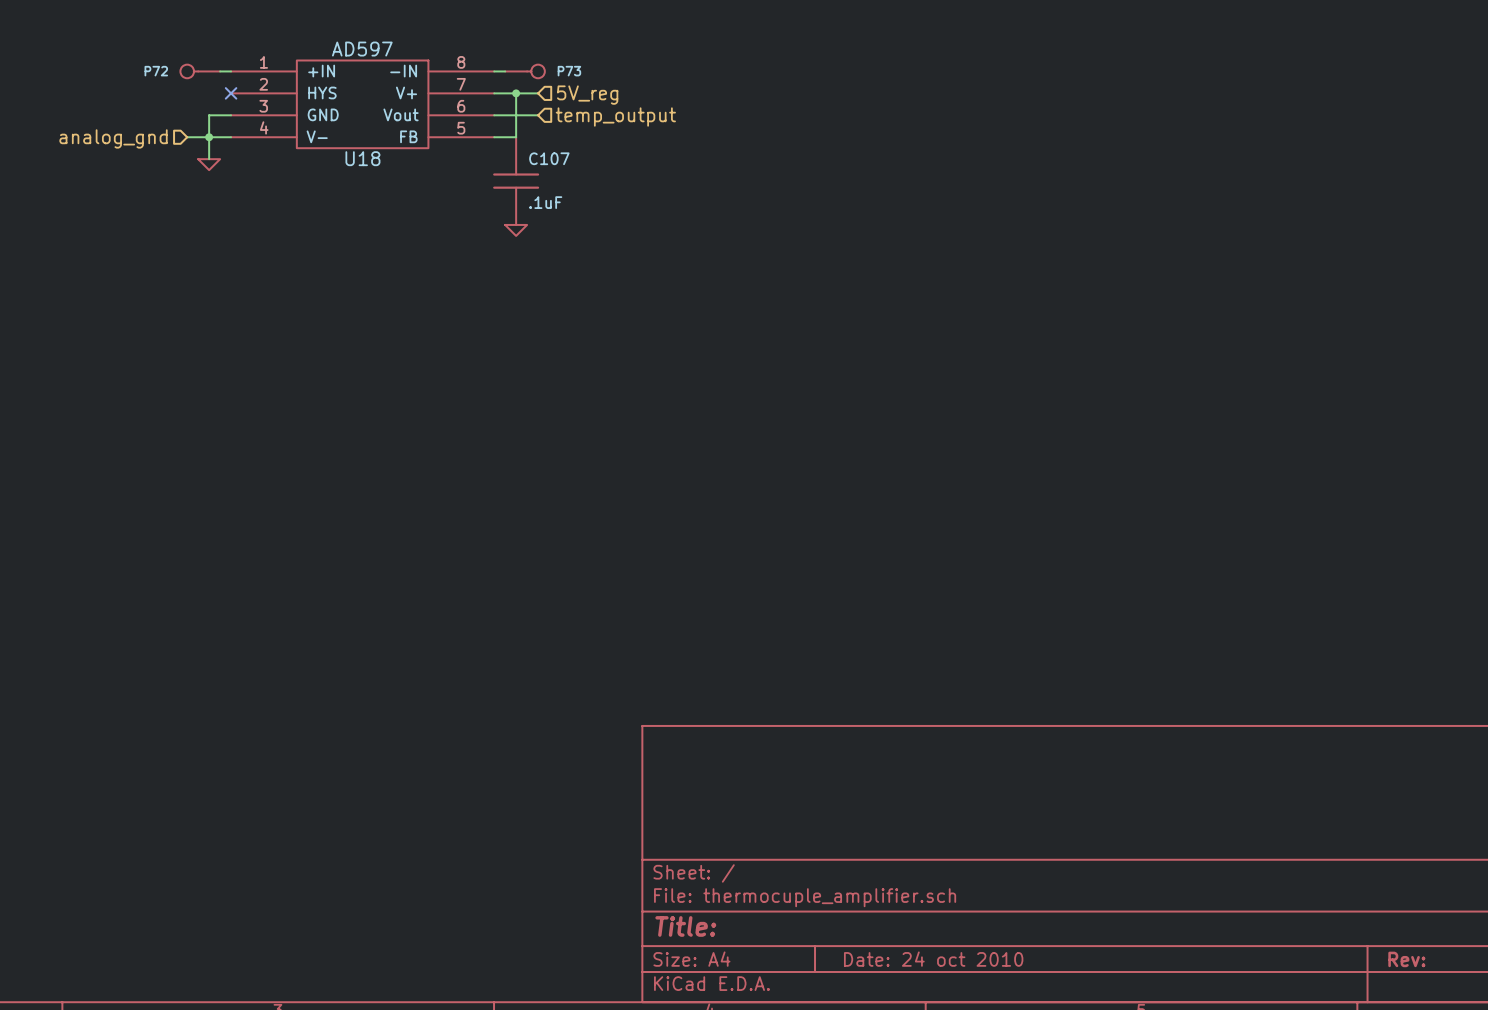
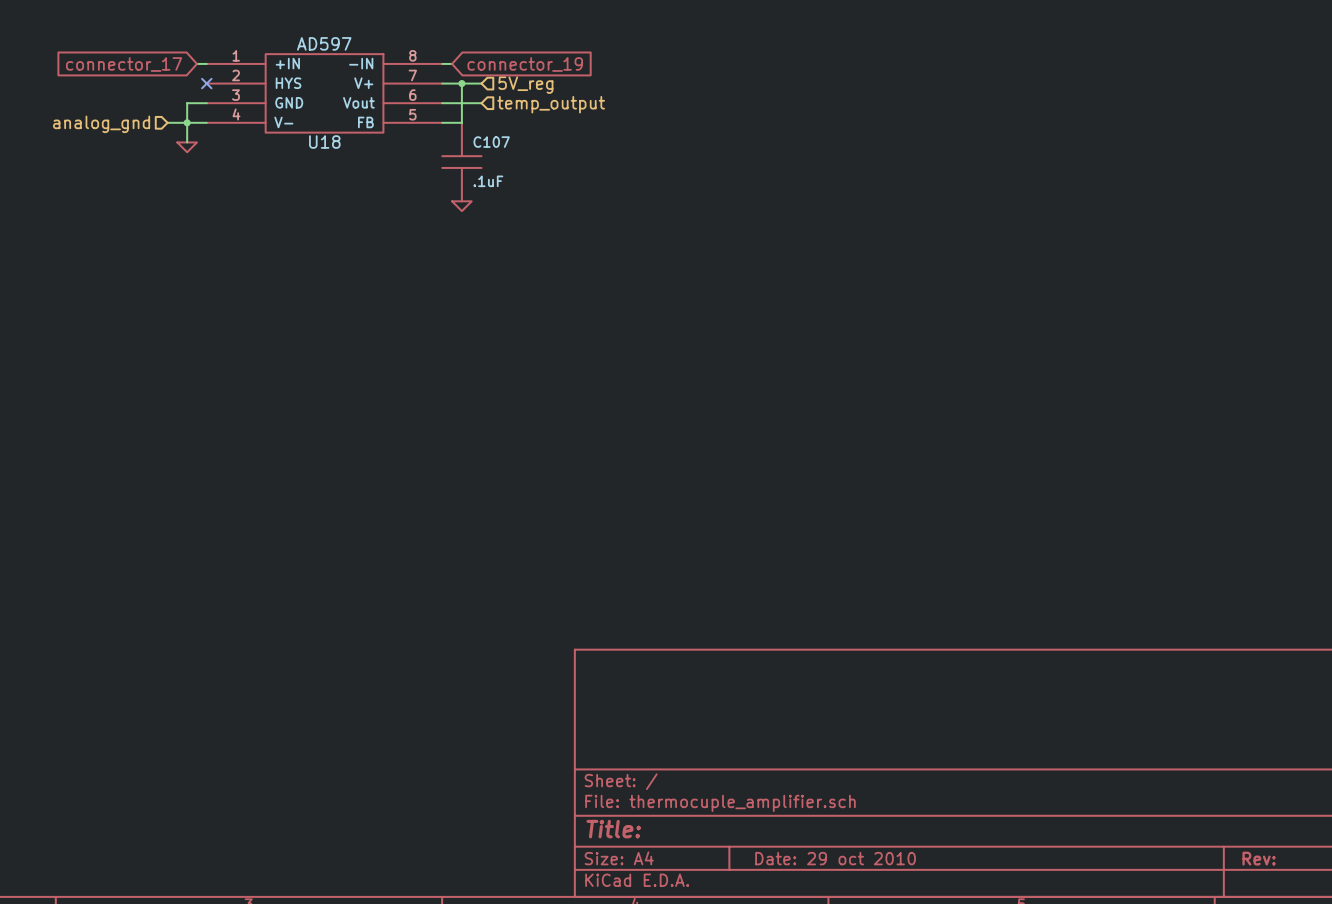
P72: (200, 71) -> none
P73: (525, 71) -> none
global label: none -> connector_17 (124, 64)
global label: none -> connector_19 (525, 64)
title block: Date: 24 oct 2010 (933, 959) -> Date: 29 oct 2010 (835, 858)

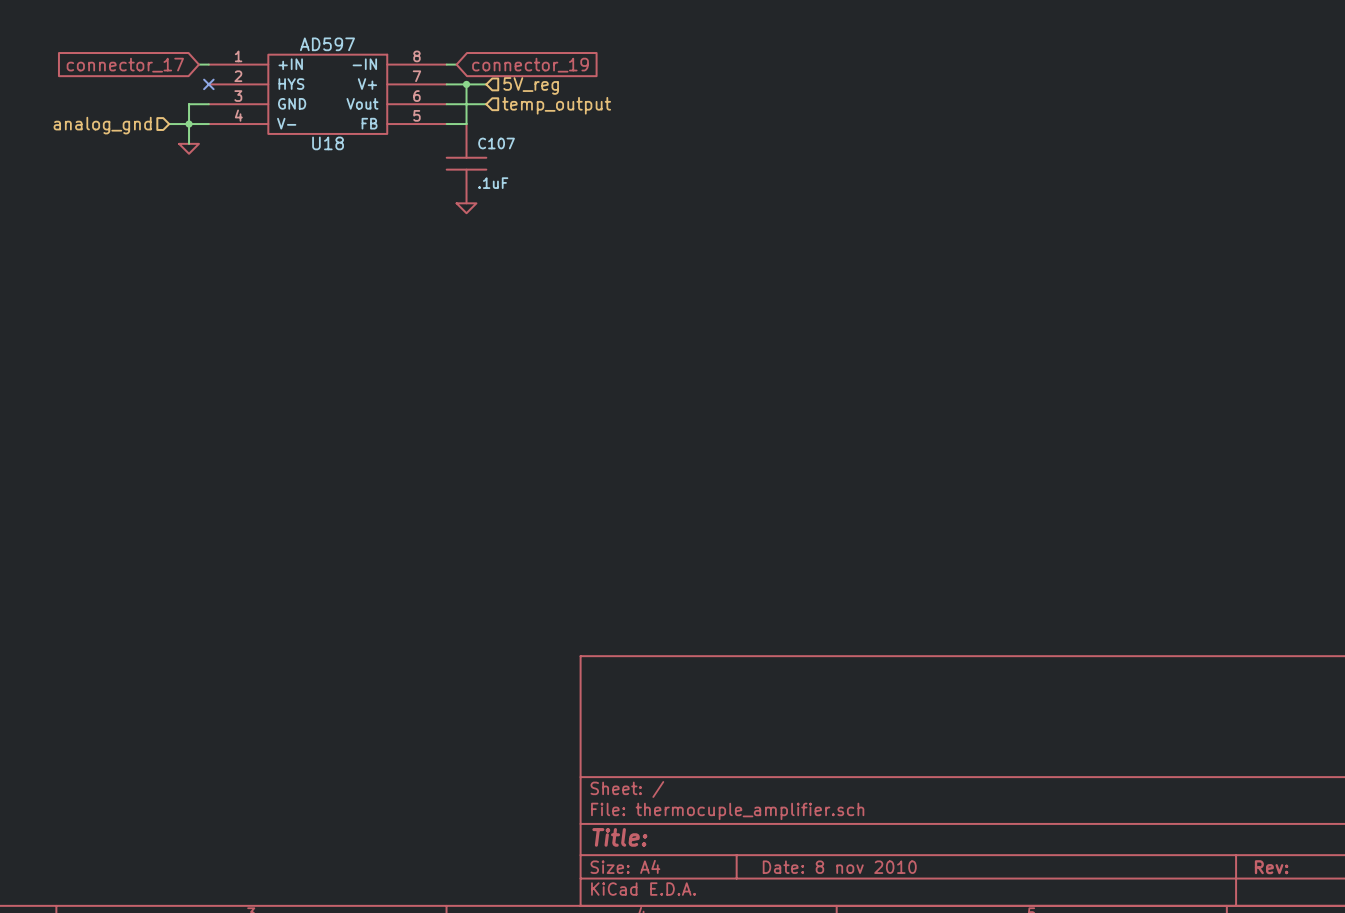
title block: Date: 29 oct 2010 (835, 858) -> Date: 8 nov 2010 (839, 867)

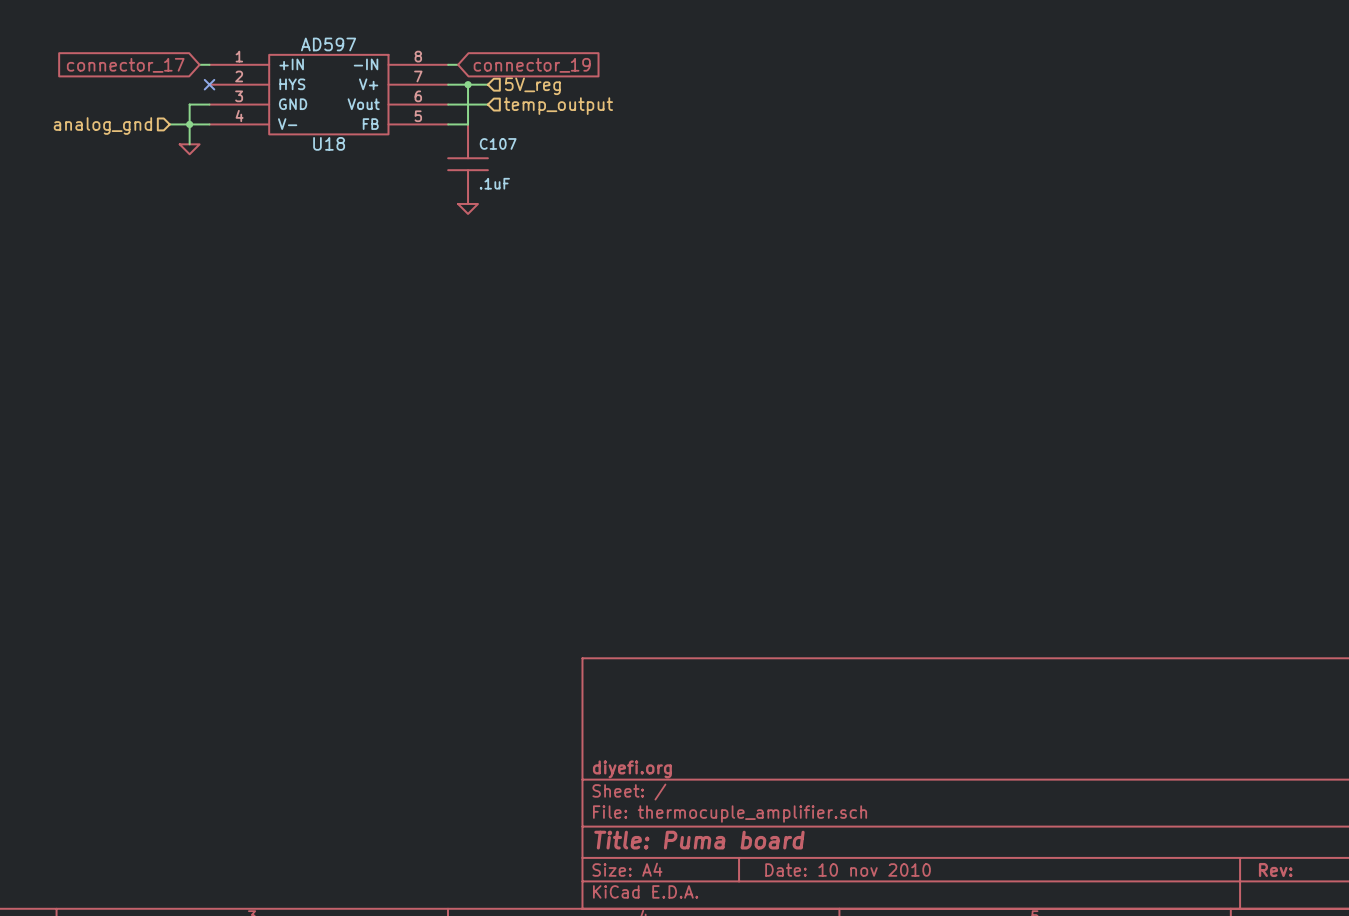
title block: none -> diyefi.org (632, 769)
title block: Title: (619, 837) -> Title: Puma board (699, 840)
title block: Date: 8 nov 2010 (839, 867) -> Date: 10 nov 2010 (848, 870)

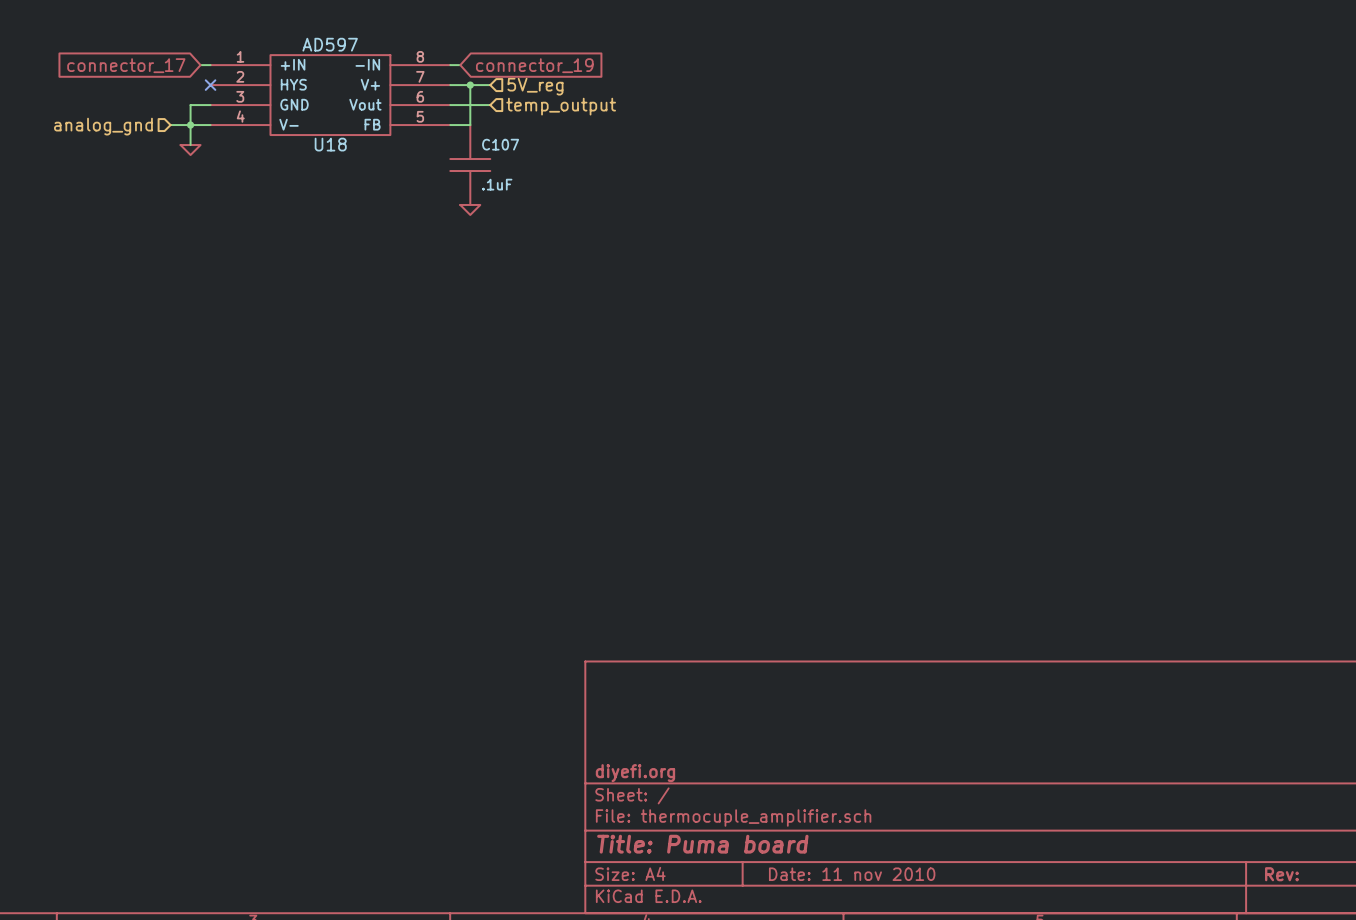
title block: Date: 10 nov 2010 (848, 870) -> Date: 11 nov 2010 (852, 874)

